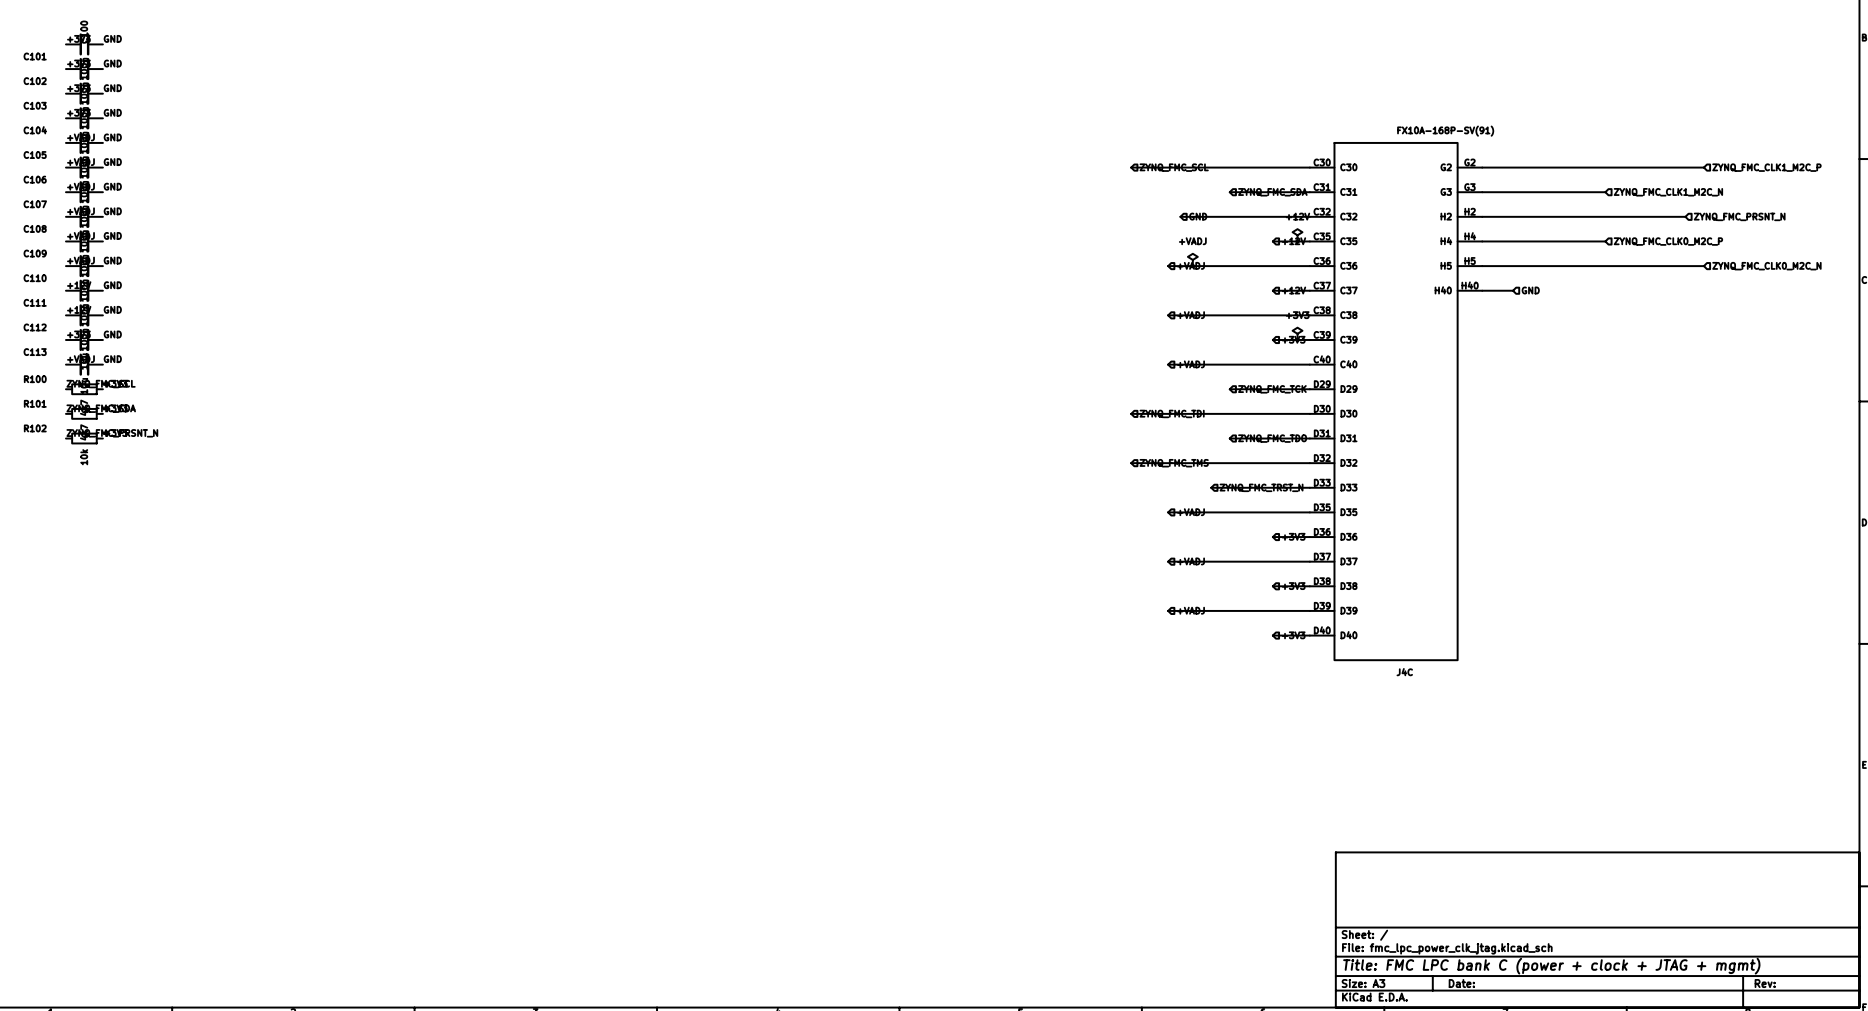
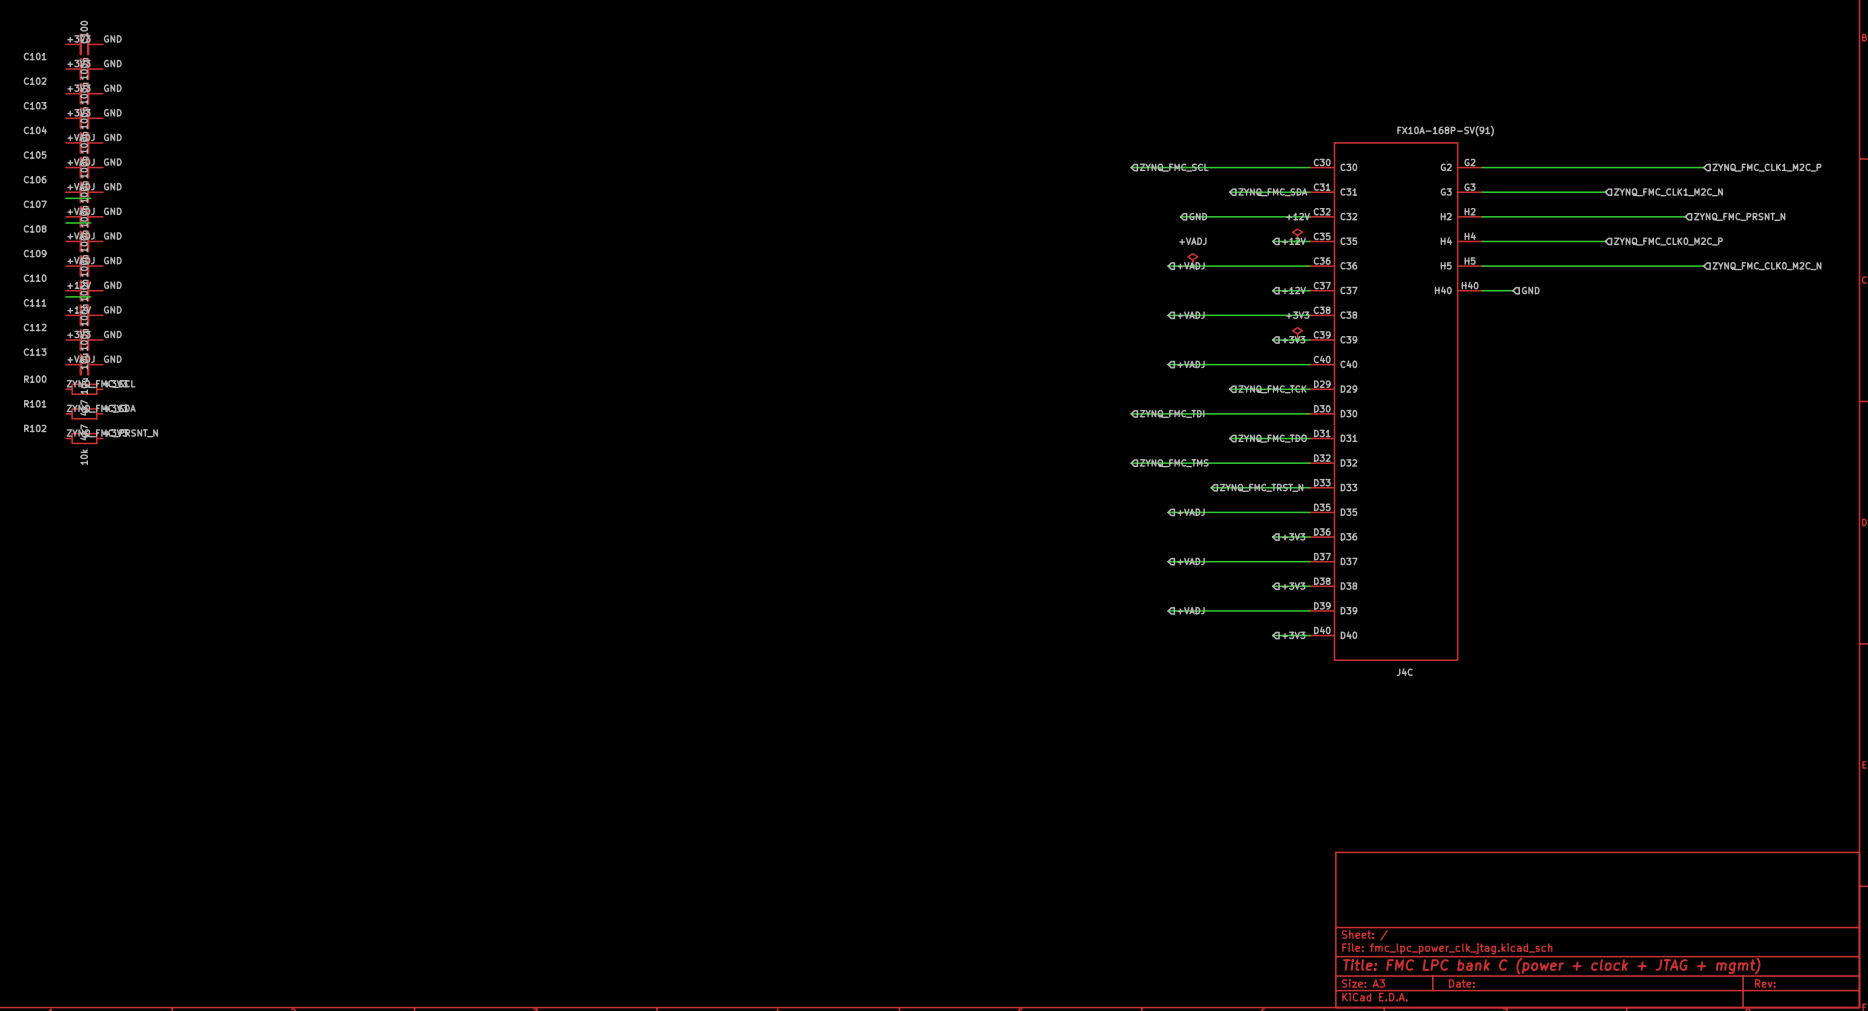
wire: none -> (65, 198) (90, 198)
wire: none -> (65, 222) (90, 222)
wire: none -> (65, 296) (90, 296)

